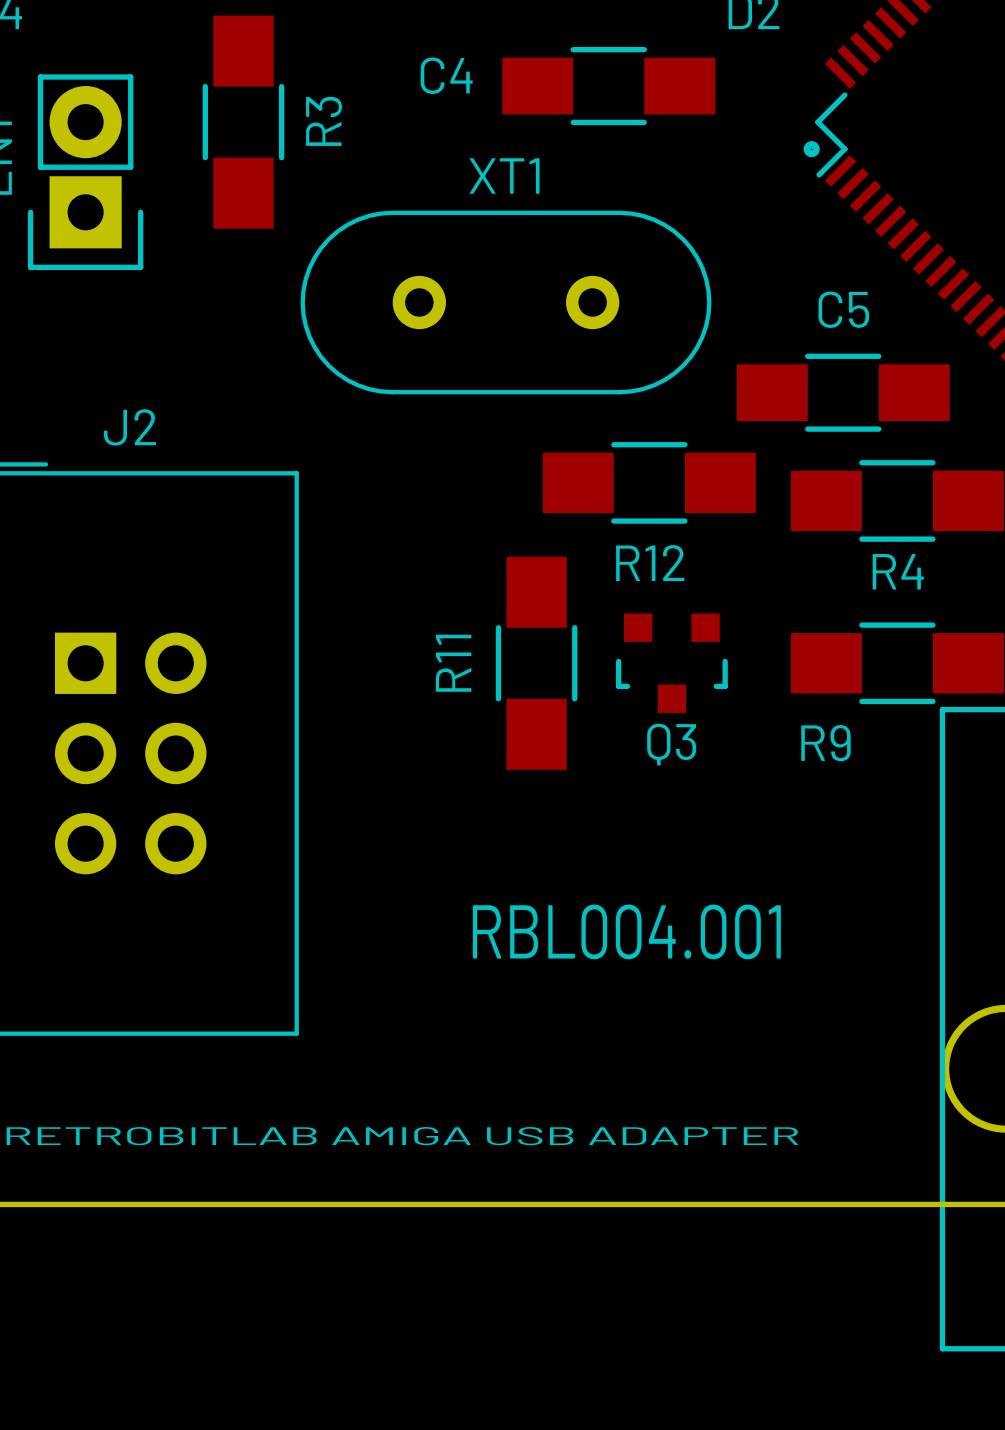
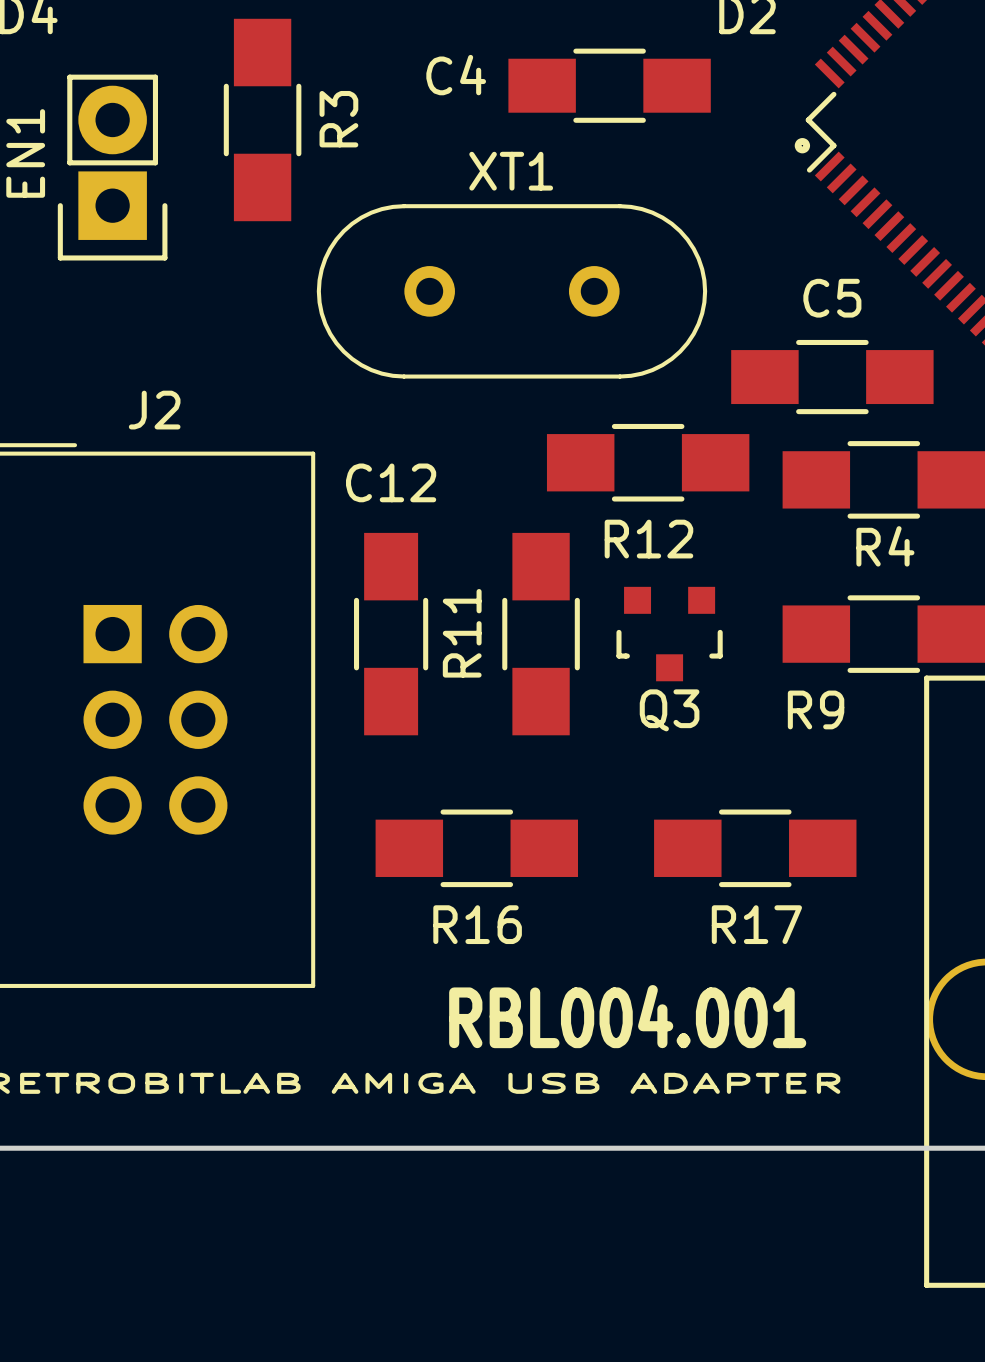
C12: none -> (391, 634)
R16: none -> (476, 848)
R17: none -> (755, 848)
text position: RBL004.001 (626, 931) -> RBL004.001 (627, 1016)

